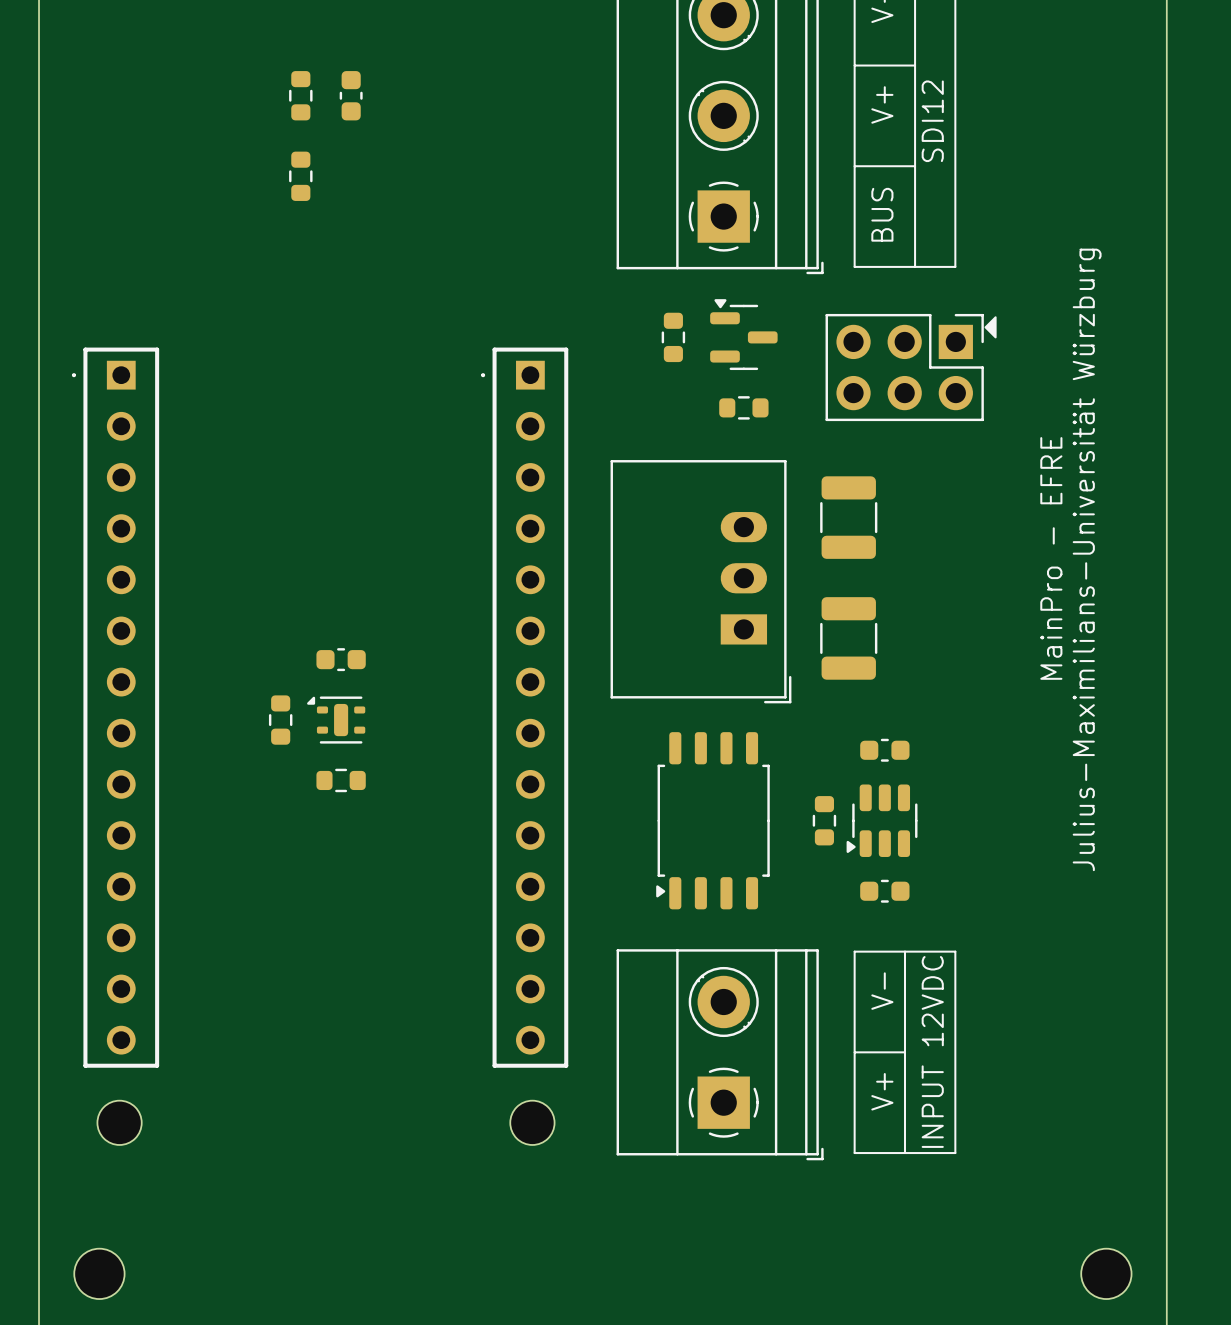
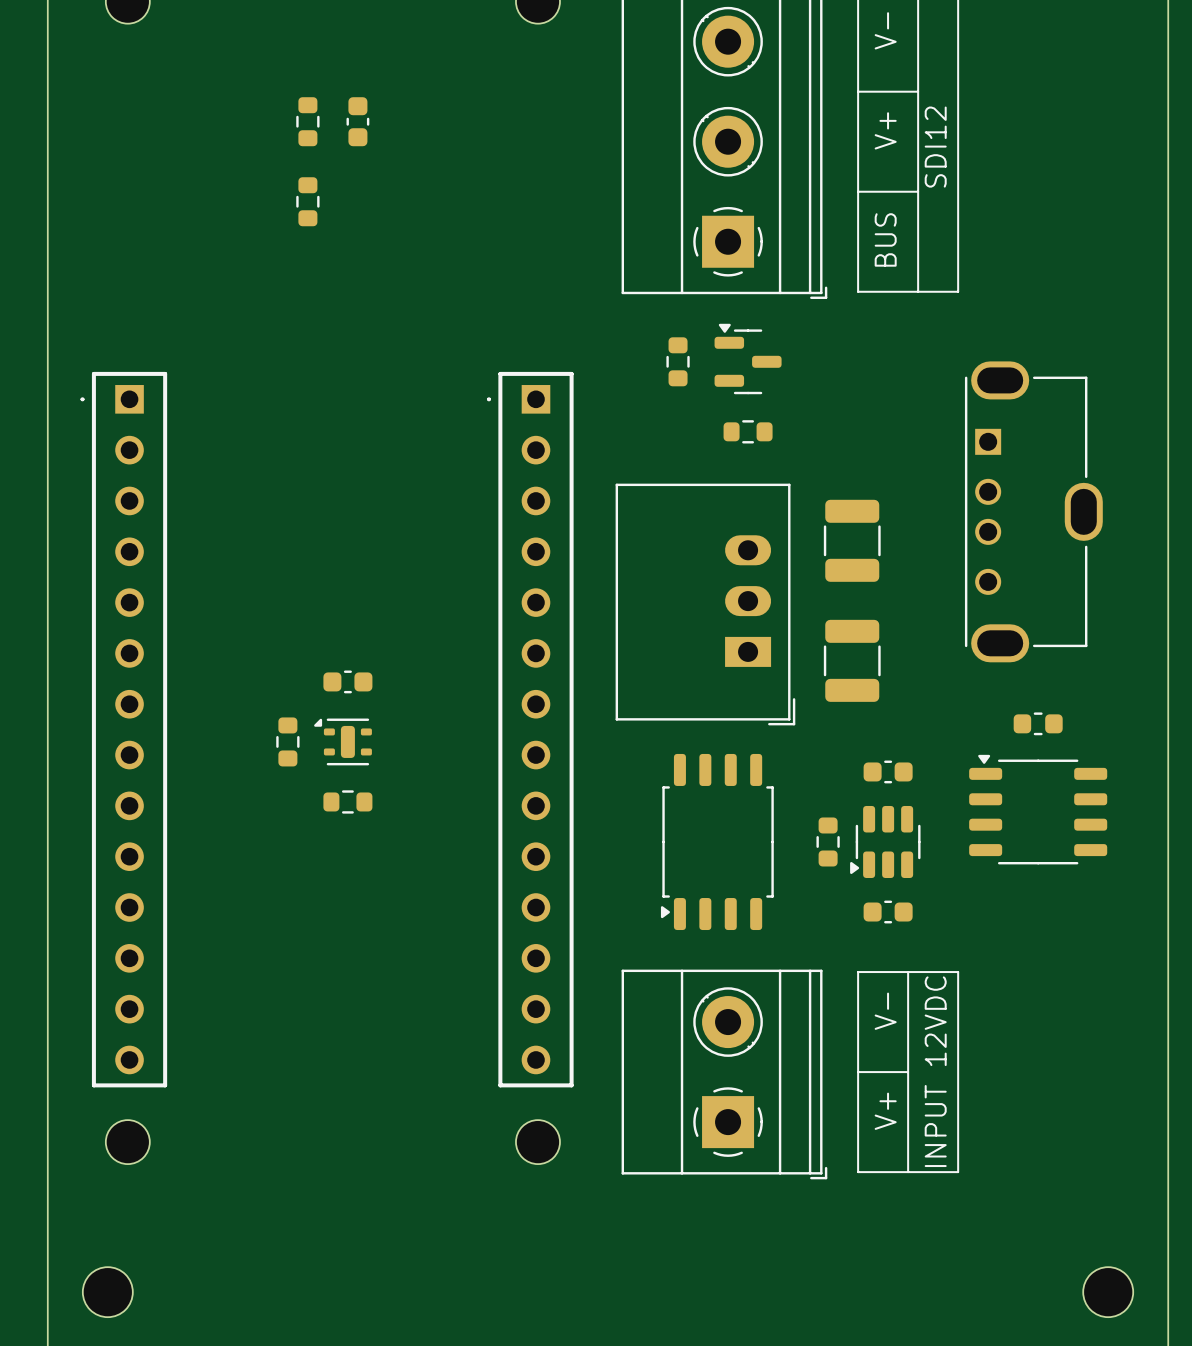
drawing: [984, 316, 997, 339] -> none
part: (904, 367) -> none
part: none -> (1033, 511)
text: MainPro - EFRE (1051, 558) -> none
text: Julius-Maximilians-Universität Würzburg (1087, 559) -> none
part: none -> (1038, 723)
part: none -> (1038, 809)

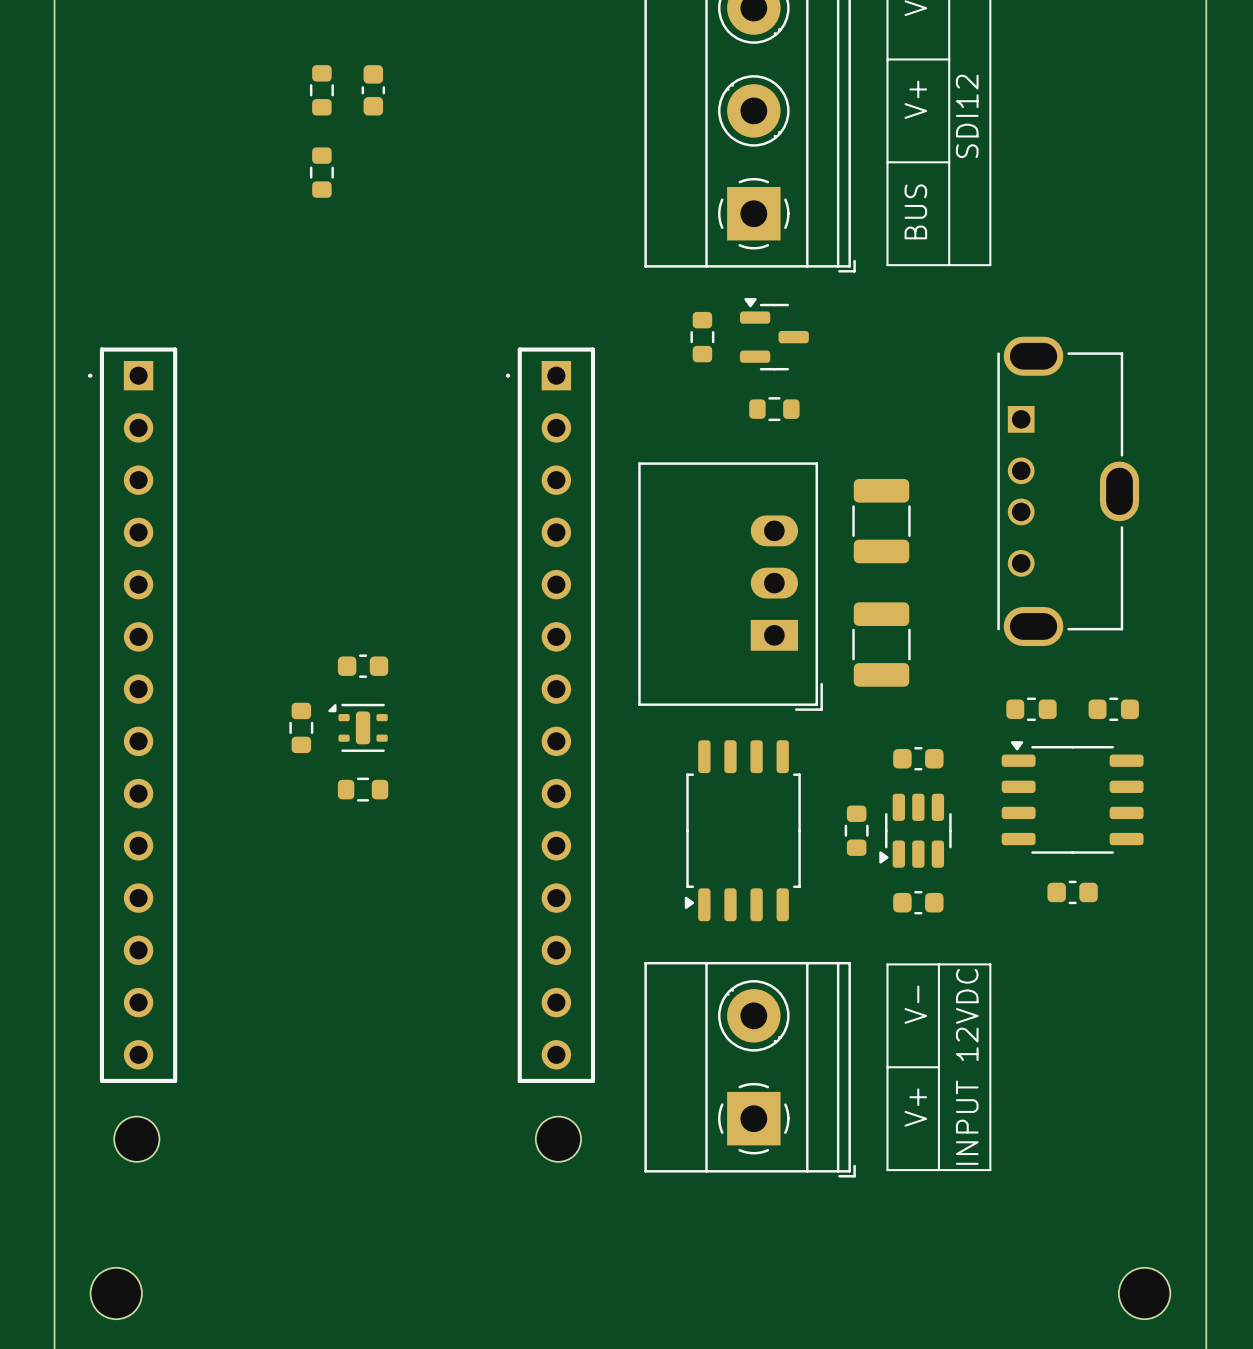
part: none -> (1031, 709)
part: (1038, 723) -> none
part: none -> (1113, 709)
part: none -> (1072, 892)

